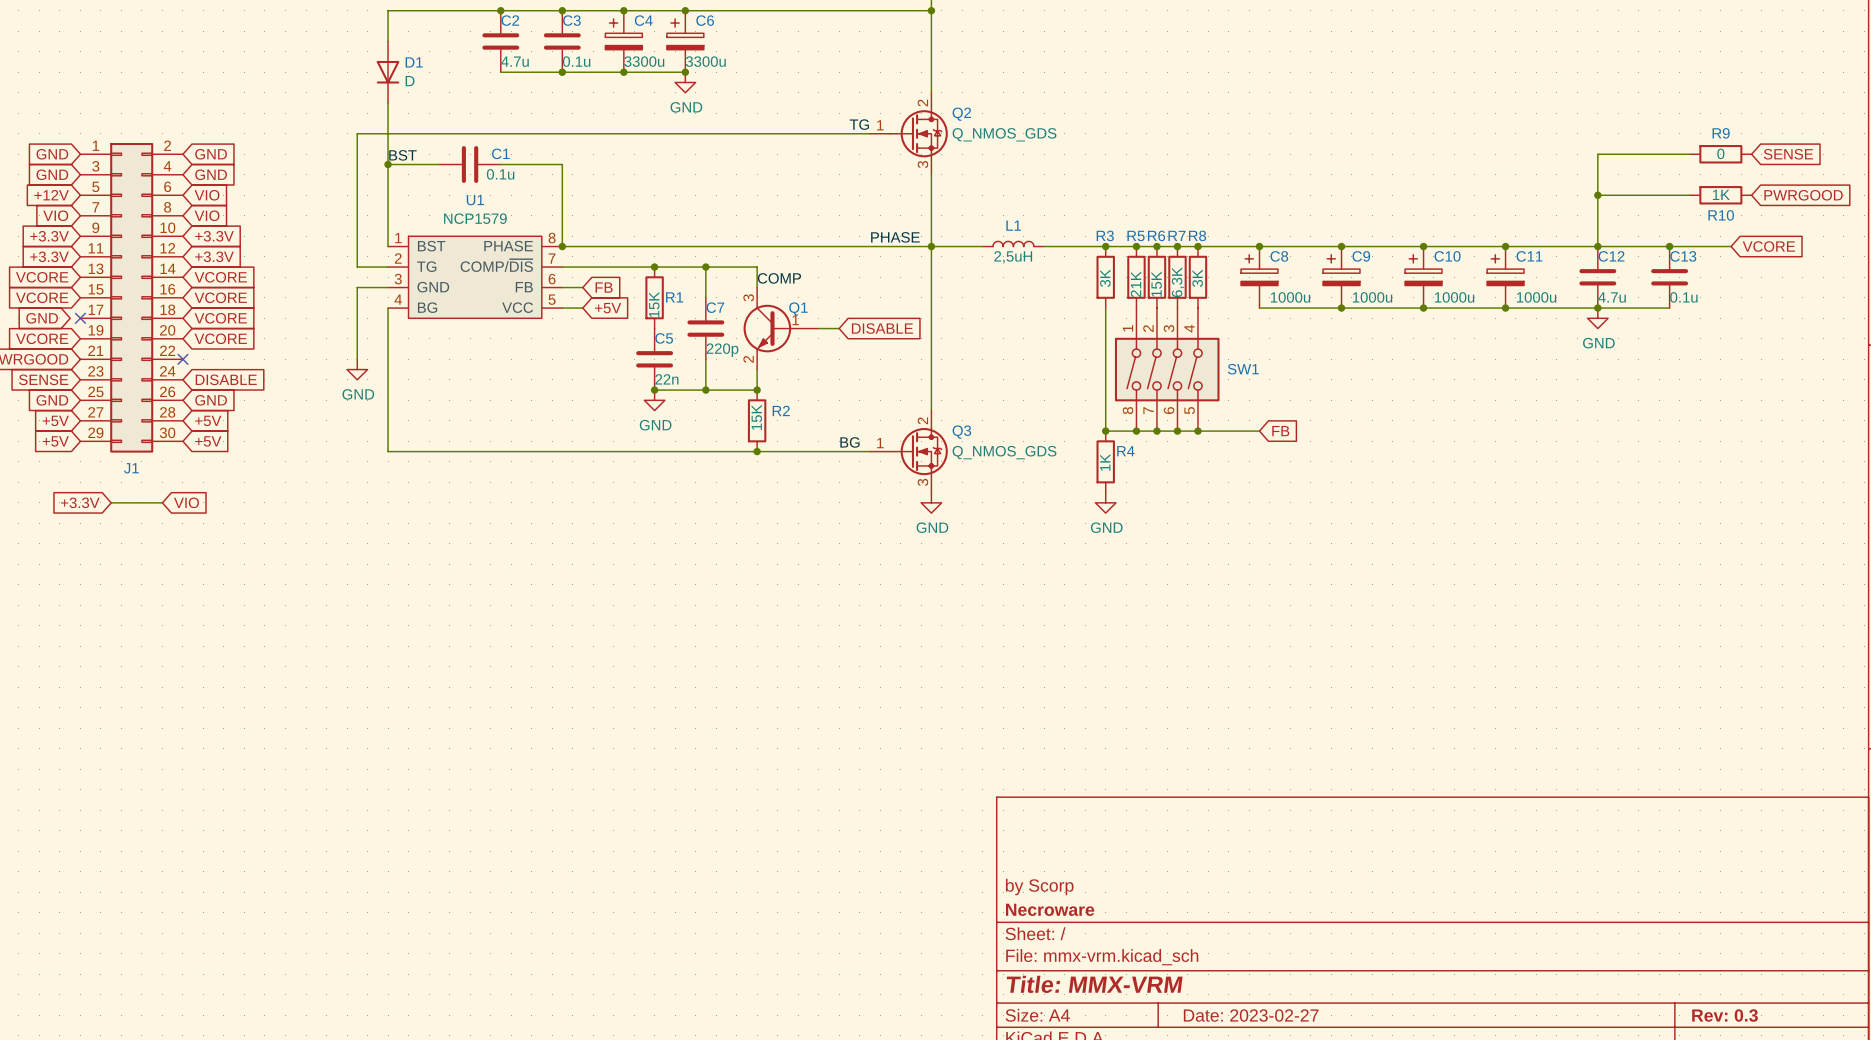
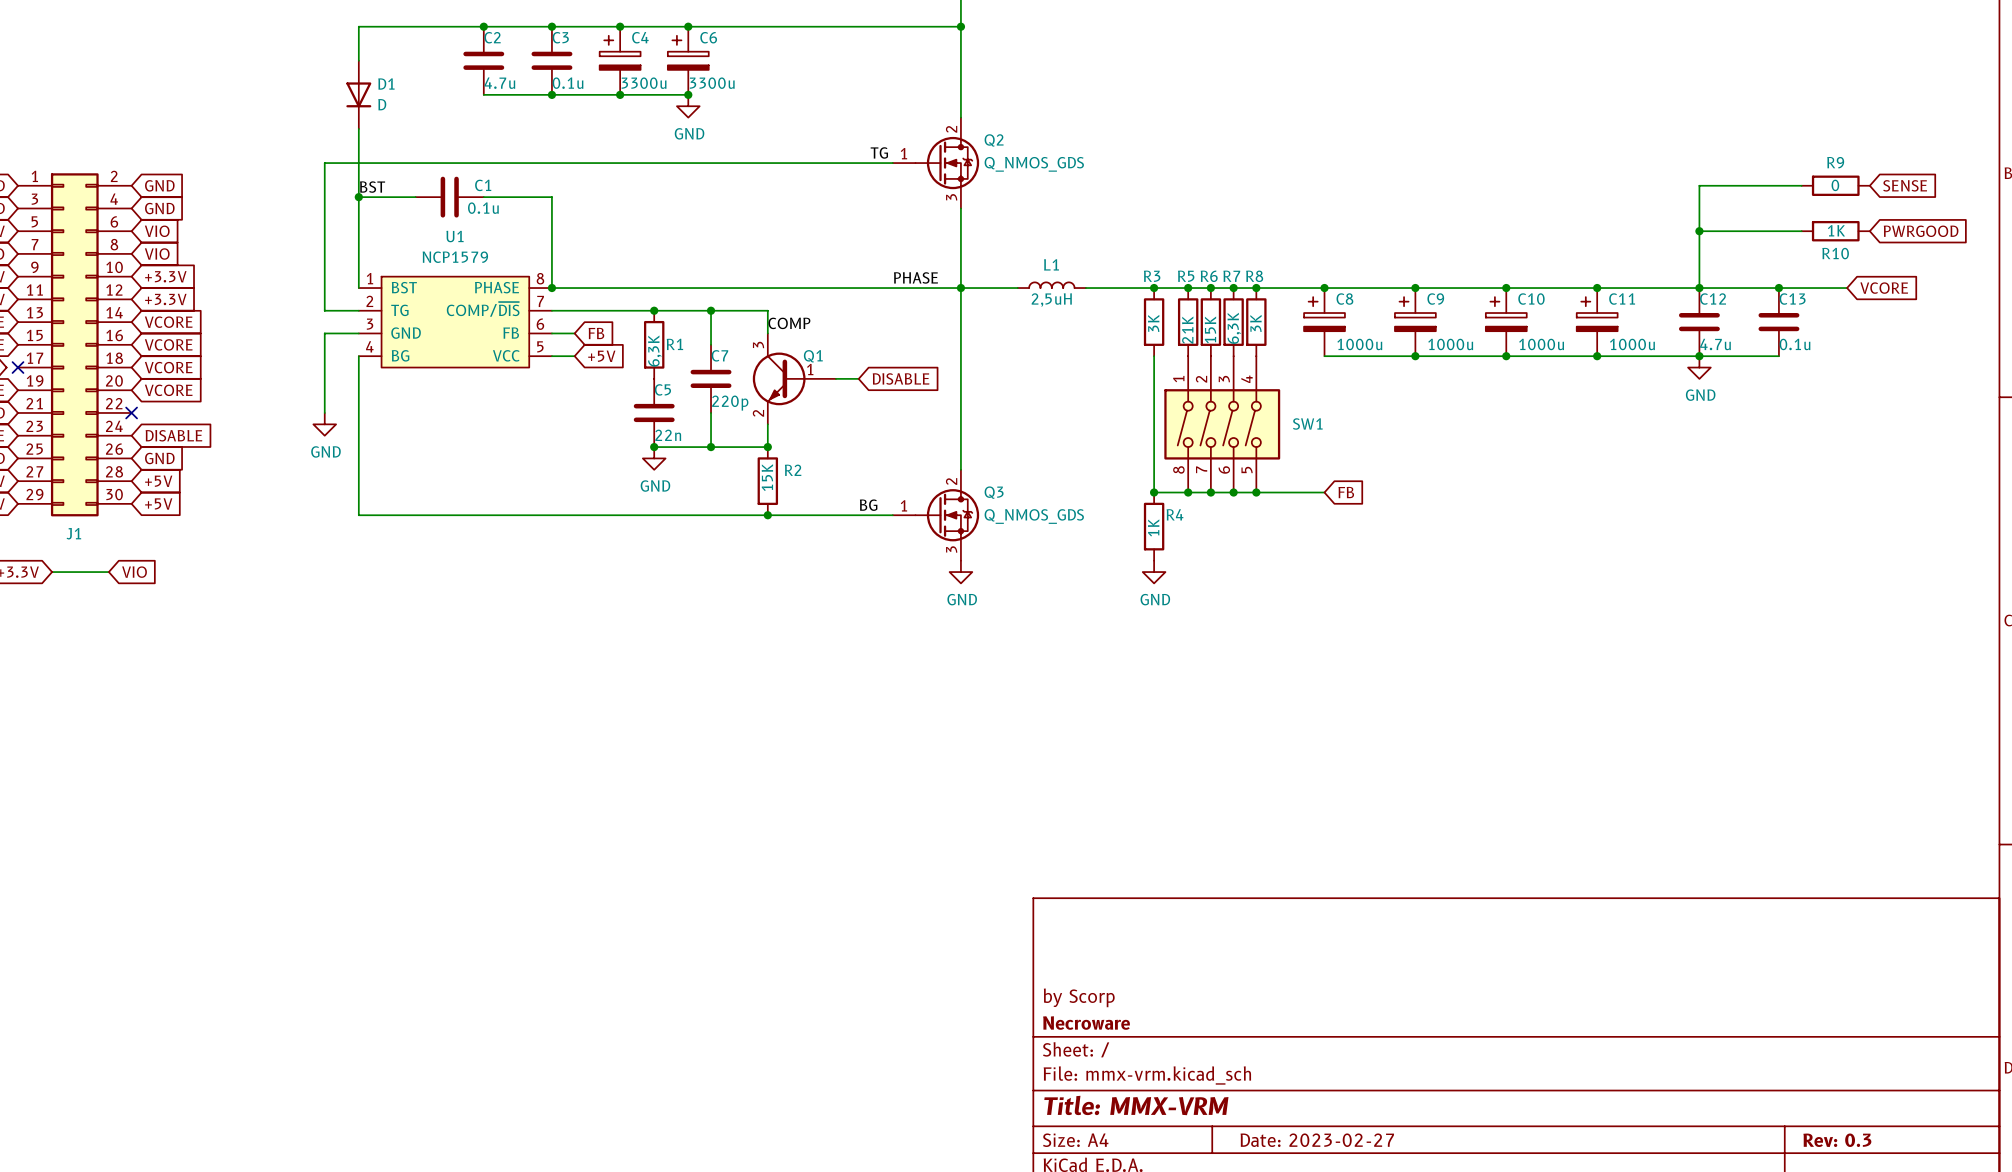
R1 value: 15K (654, 304) -> 6,3K (654, 351)

